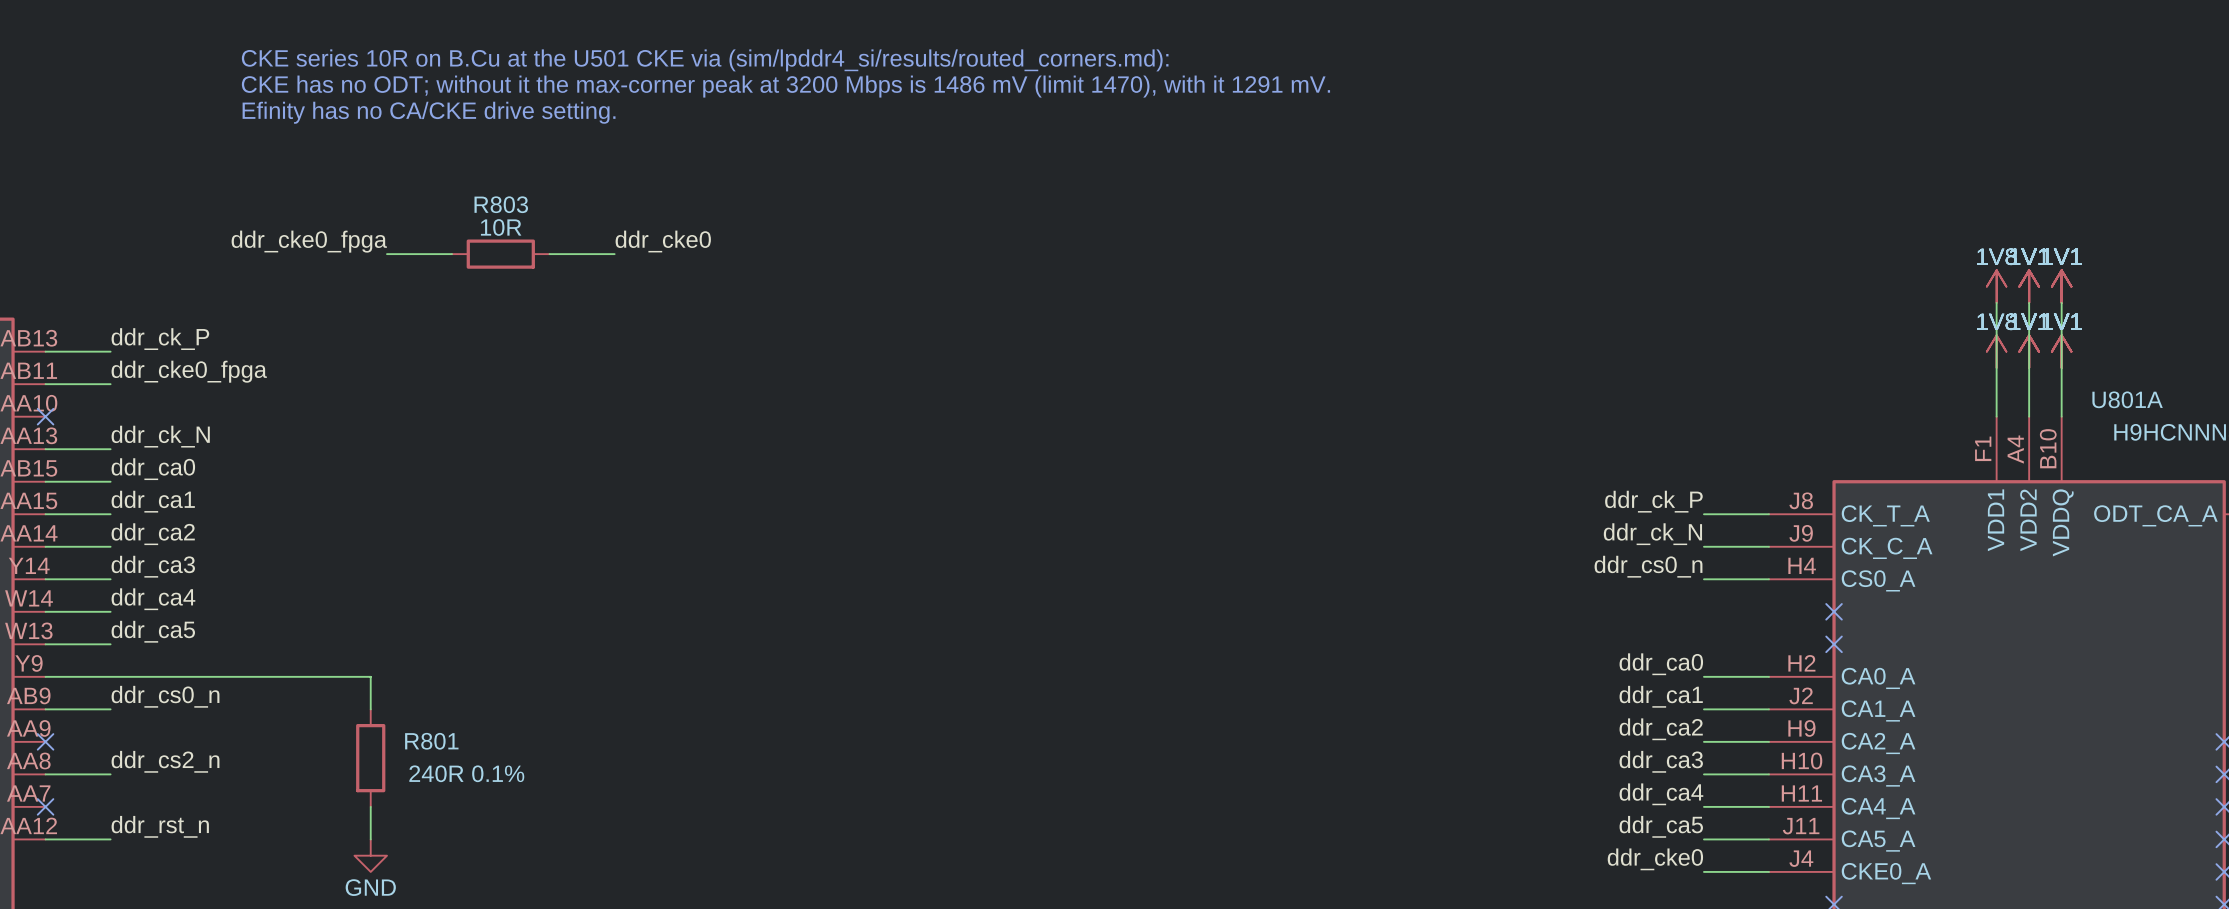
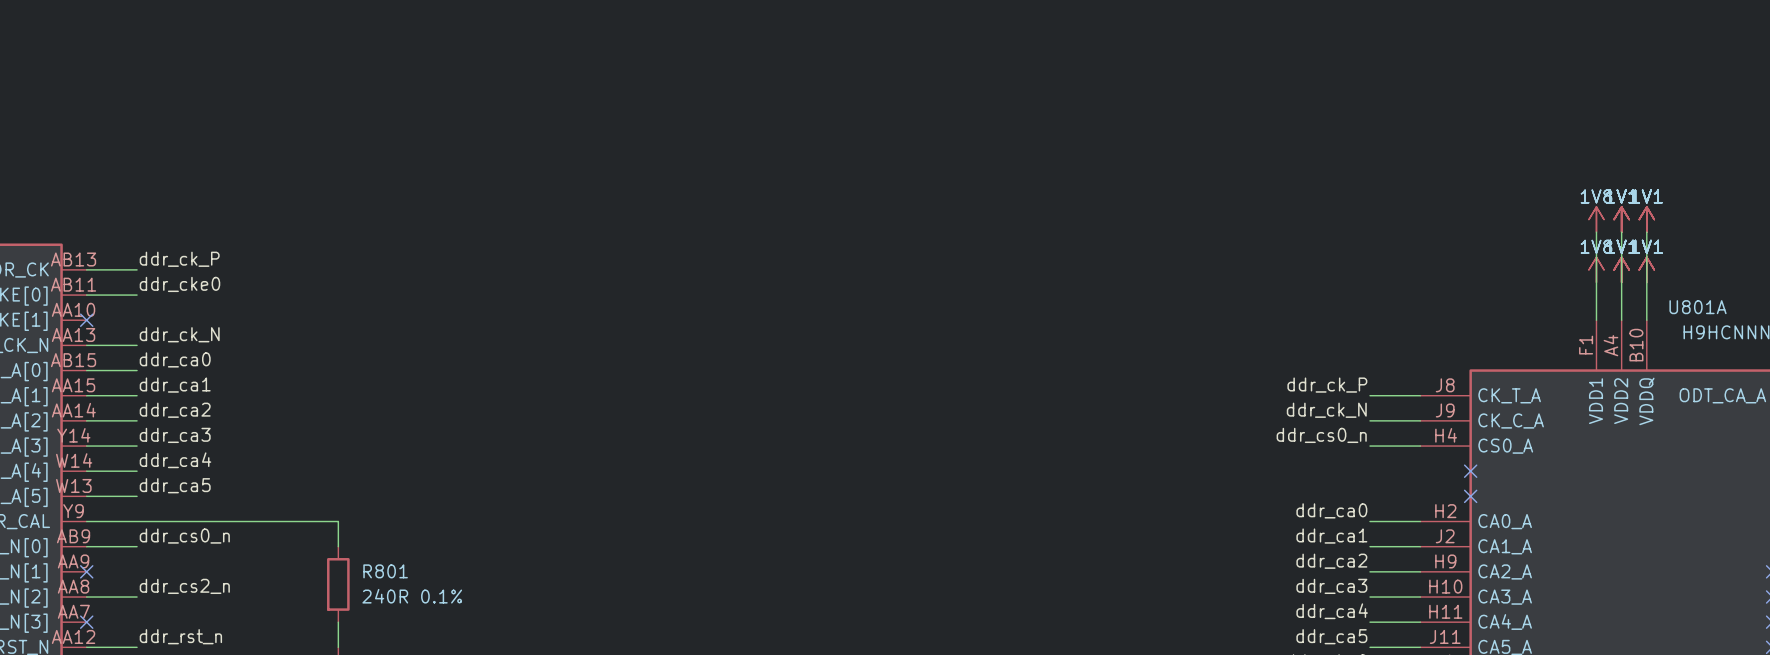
text: CKE series 10R on B.Cu at the U501 CKE via (sim/lpddr4_si/results/routed_corners.md): (705, 60) -> none
text: CKE has no ODT; without it the max-corner peak at 3200 Mbps is 1486 mV (limit 1470), with it 1291 mV. (785, 86) -> none
text: Efinity has no CA/CKE drive setting. (429, 112) -> none
label: ddr_cke0_fpga (309, 241) -> none
label: ddr_cke0 (663, 241) -> none
wire: (386, 254) (452, 254) -> none
R803: 10R (500, 254) -> none
wire: (549, 254) (614, 254) -> none
label: ddr_cke0_fpga (189, 371) -> ddr_cke0 (179, 284)

